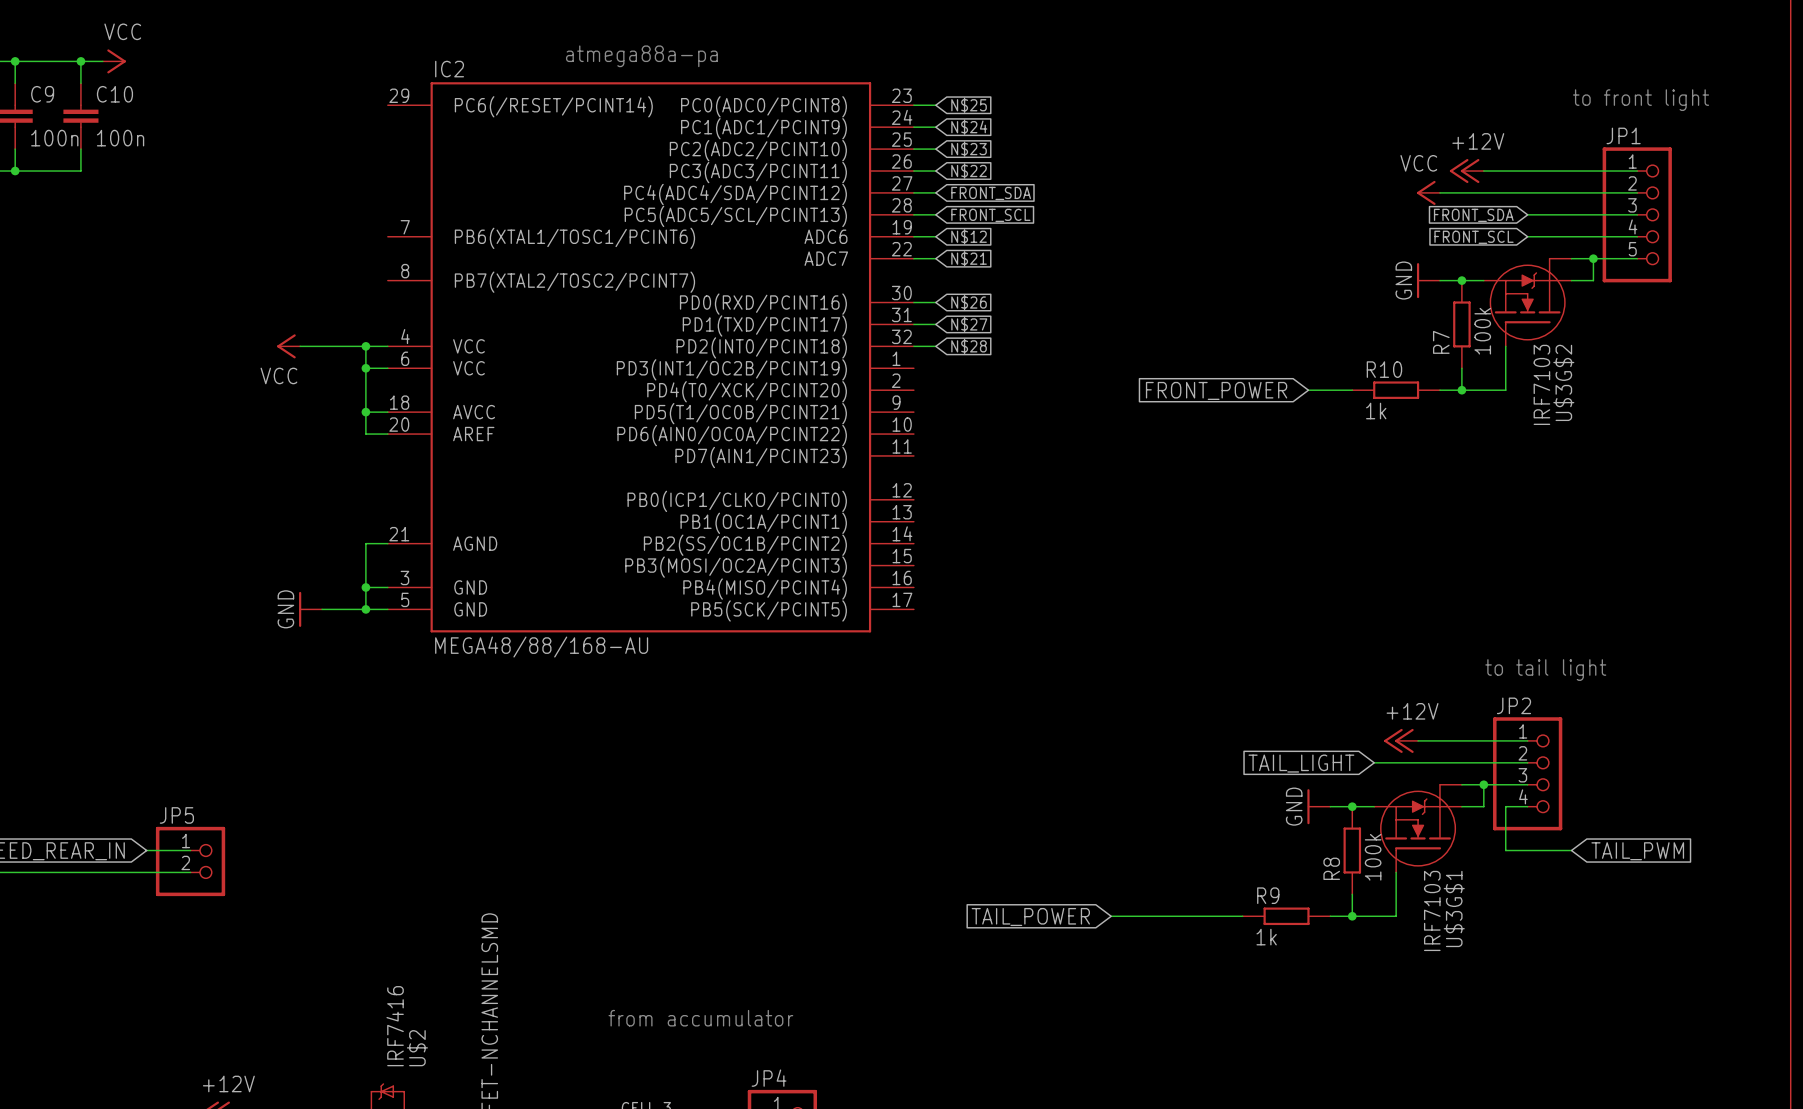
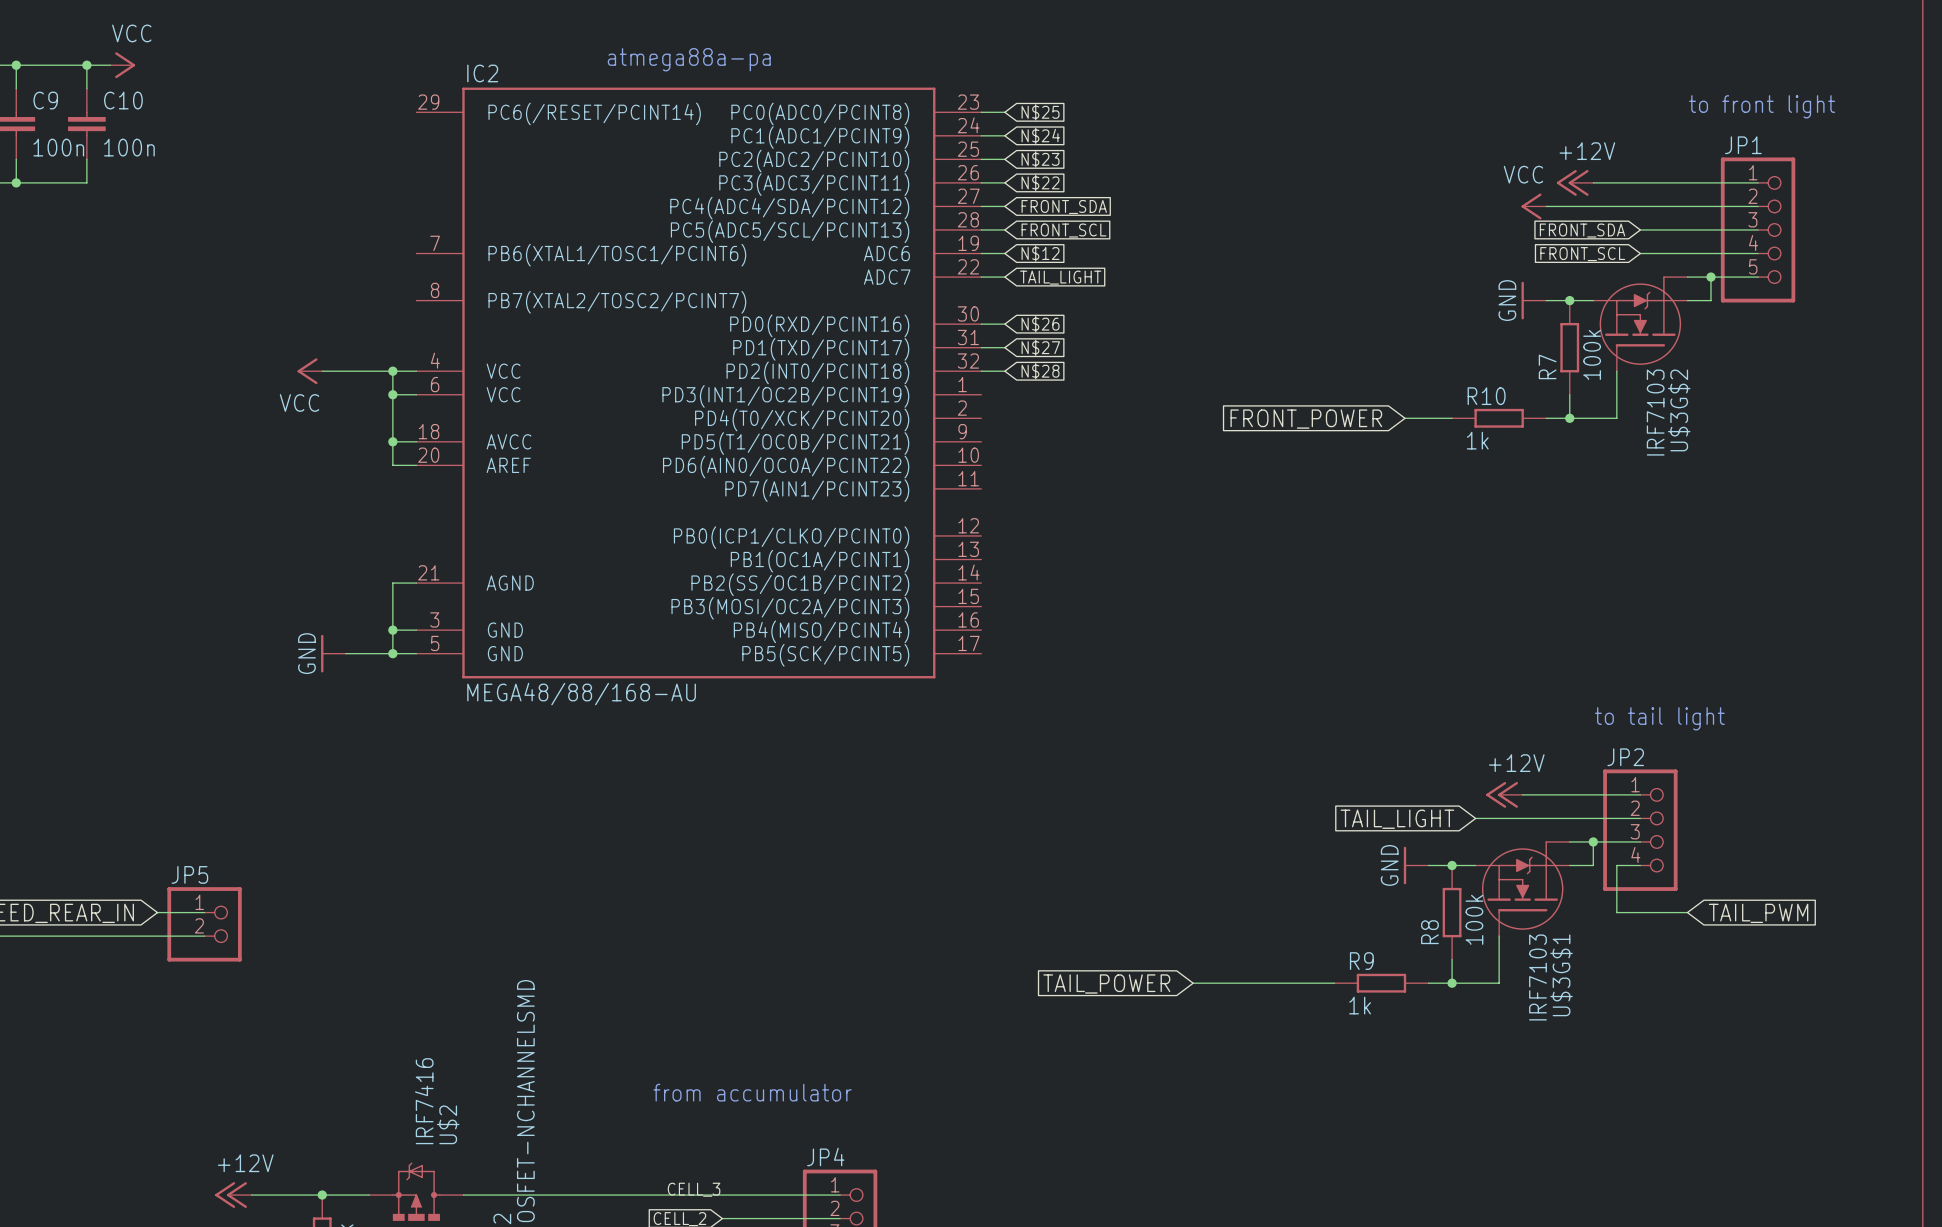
global label: N$21 (969, 258) -> TAIL_LIGHT (1060, 277)

